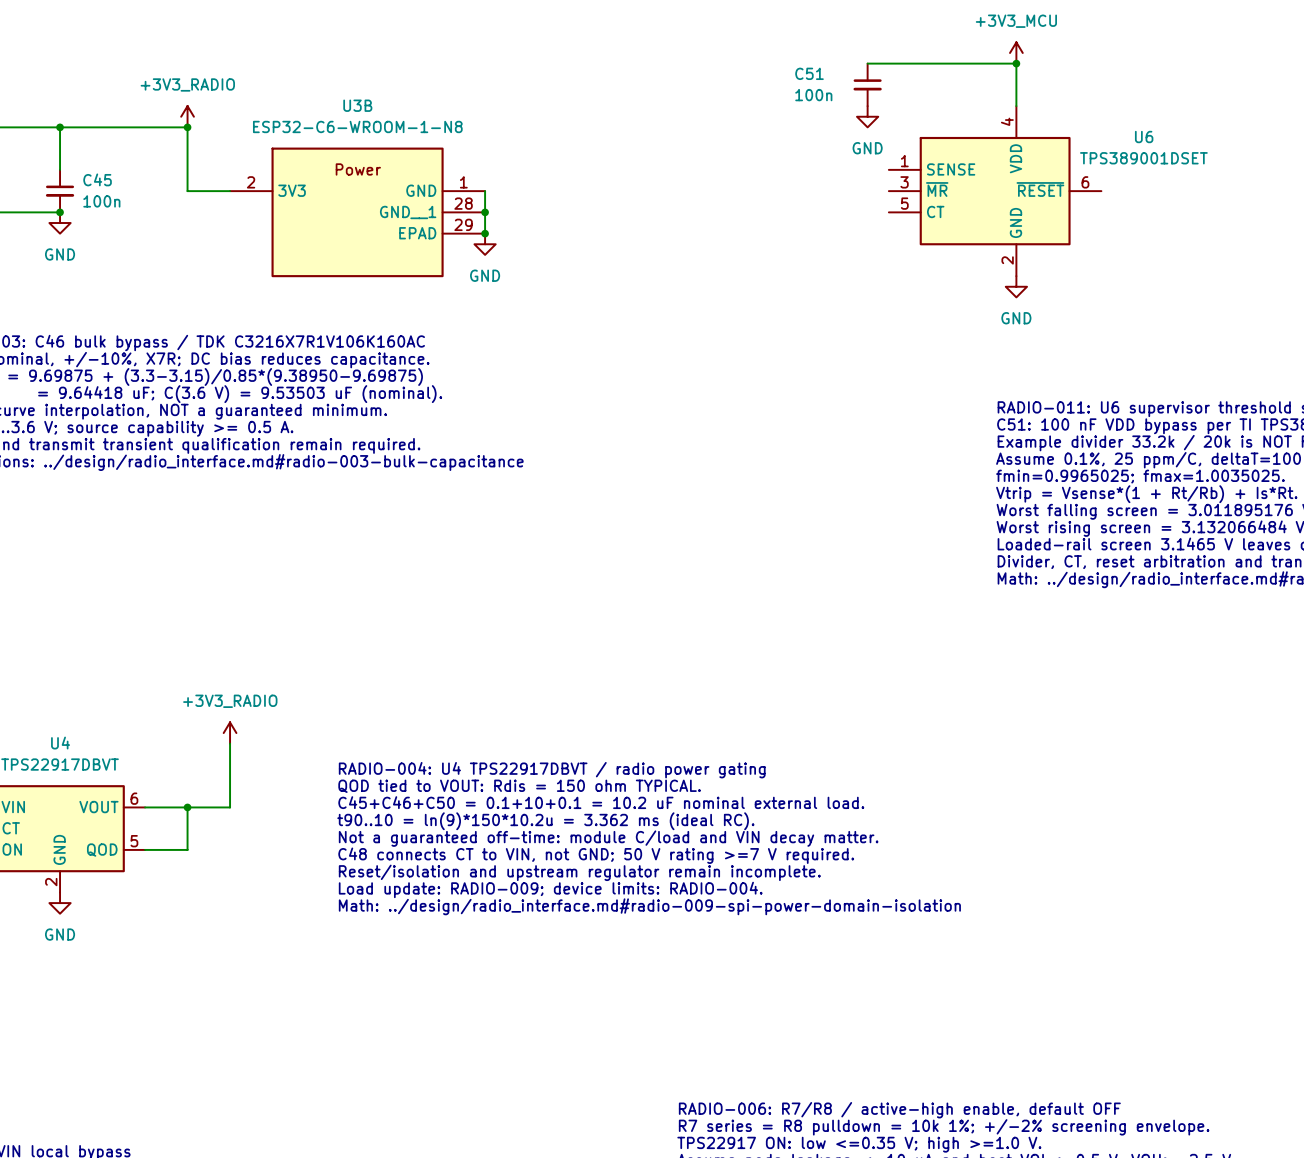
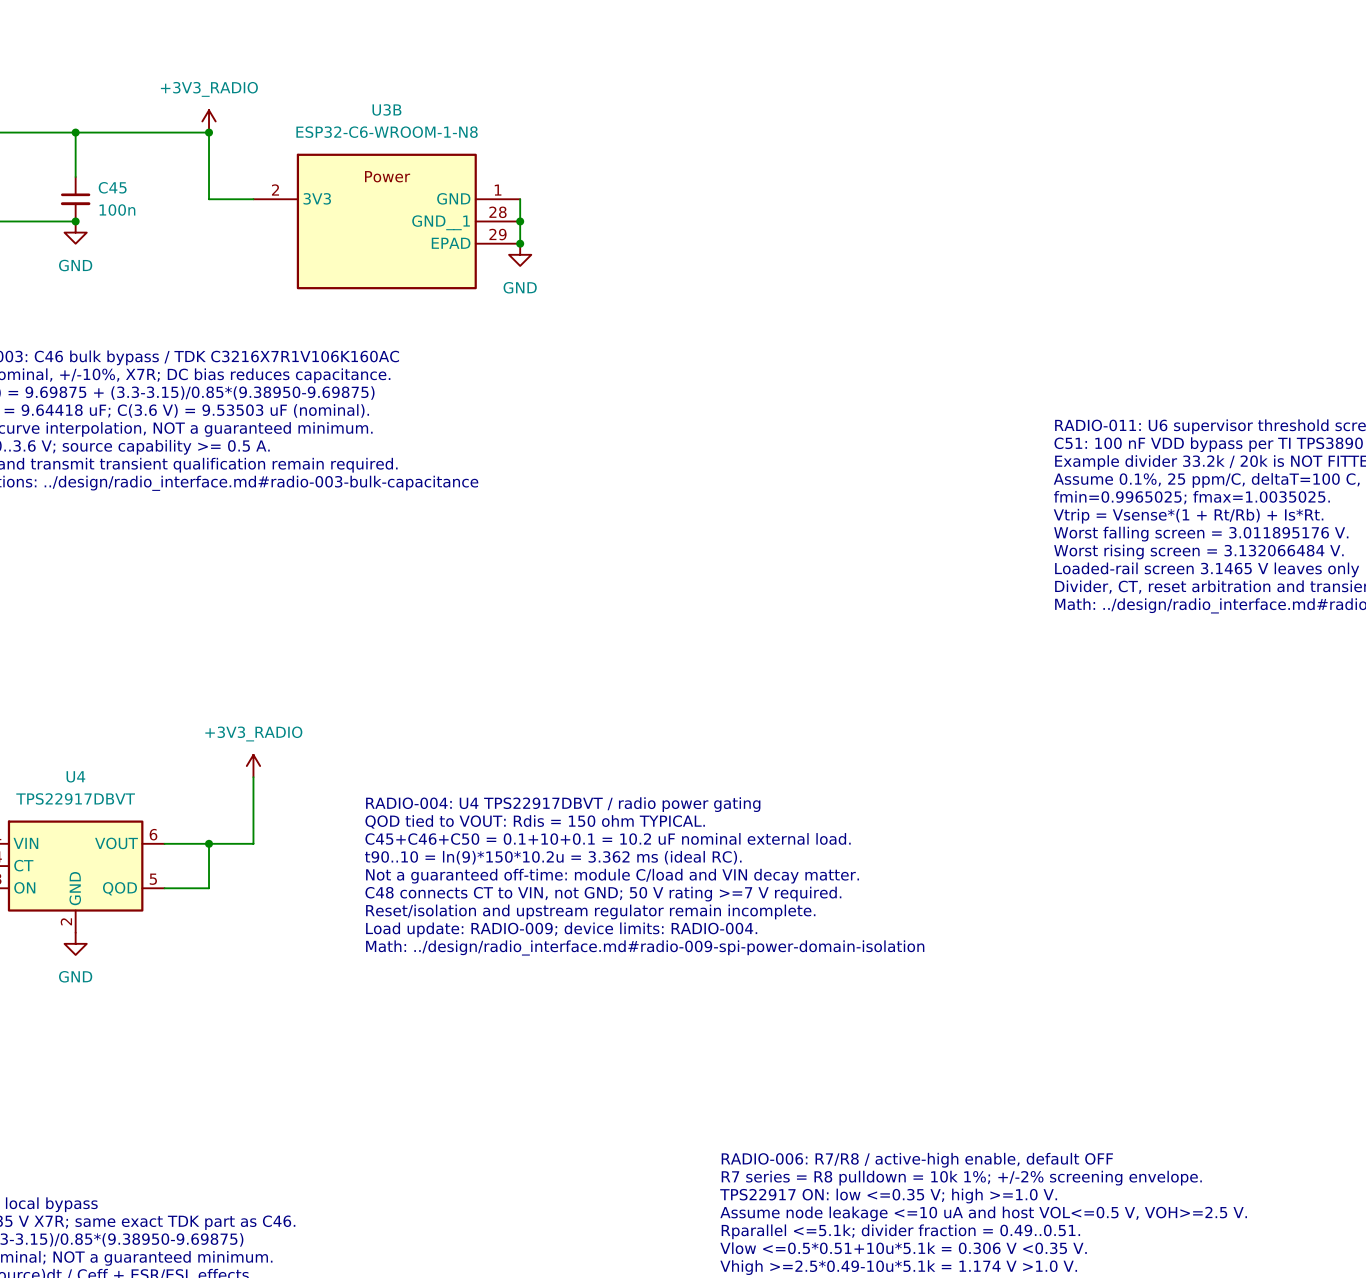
power symbol: +3V3_MCU (1016, 52) -> none
wire: (867, 63) (1016, 63) (1016, 106) -> none
junction: (1016, 63) -> none
C51: 100n (867, 84) -> none
power symbol: GND (867, 116) -> none
U6: TPS389001DSET (995, 191) -> none
power symbol: GND (1016, 286) -> none

